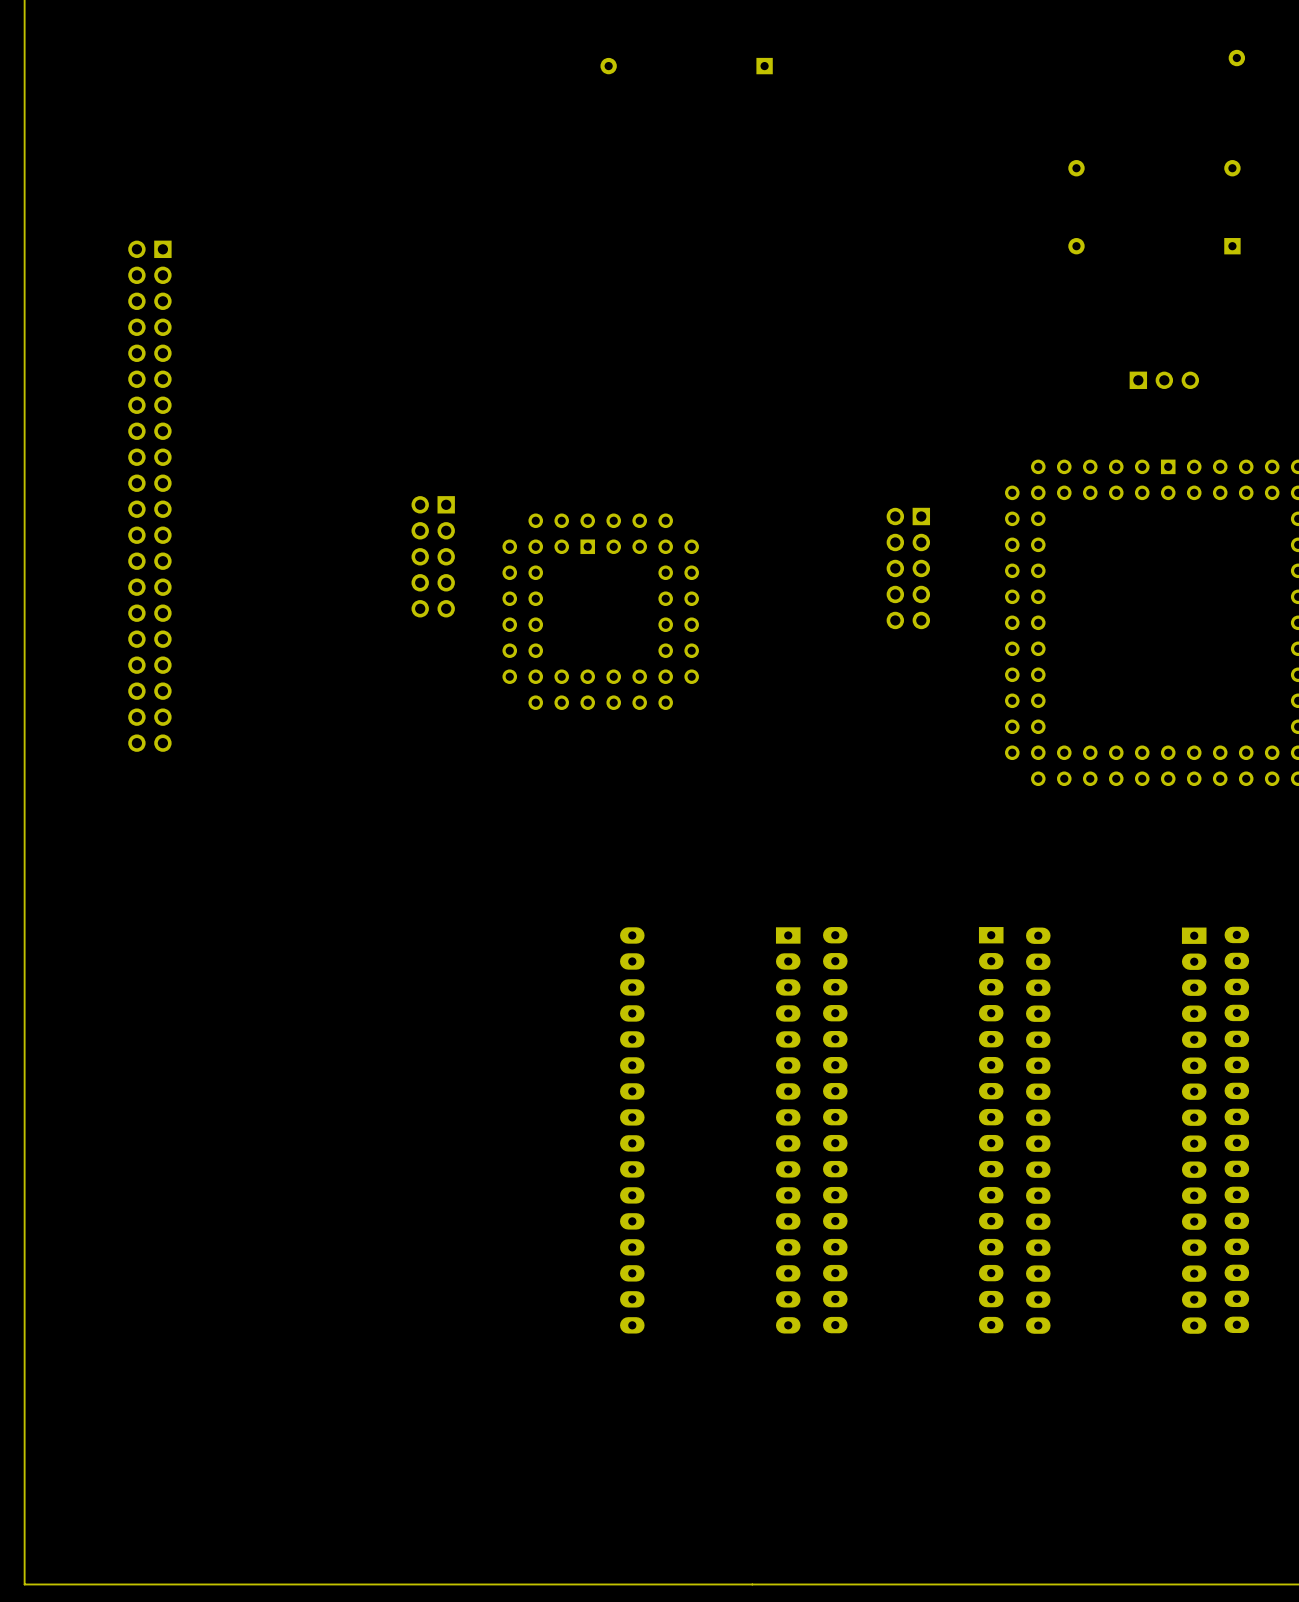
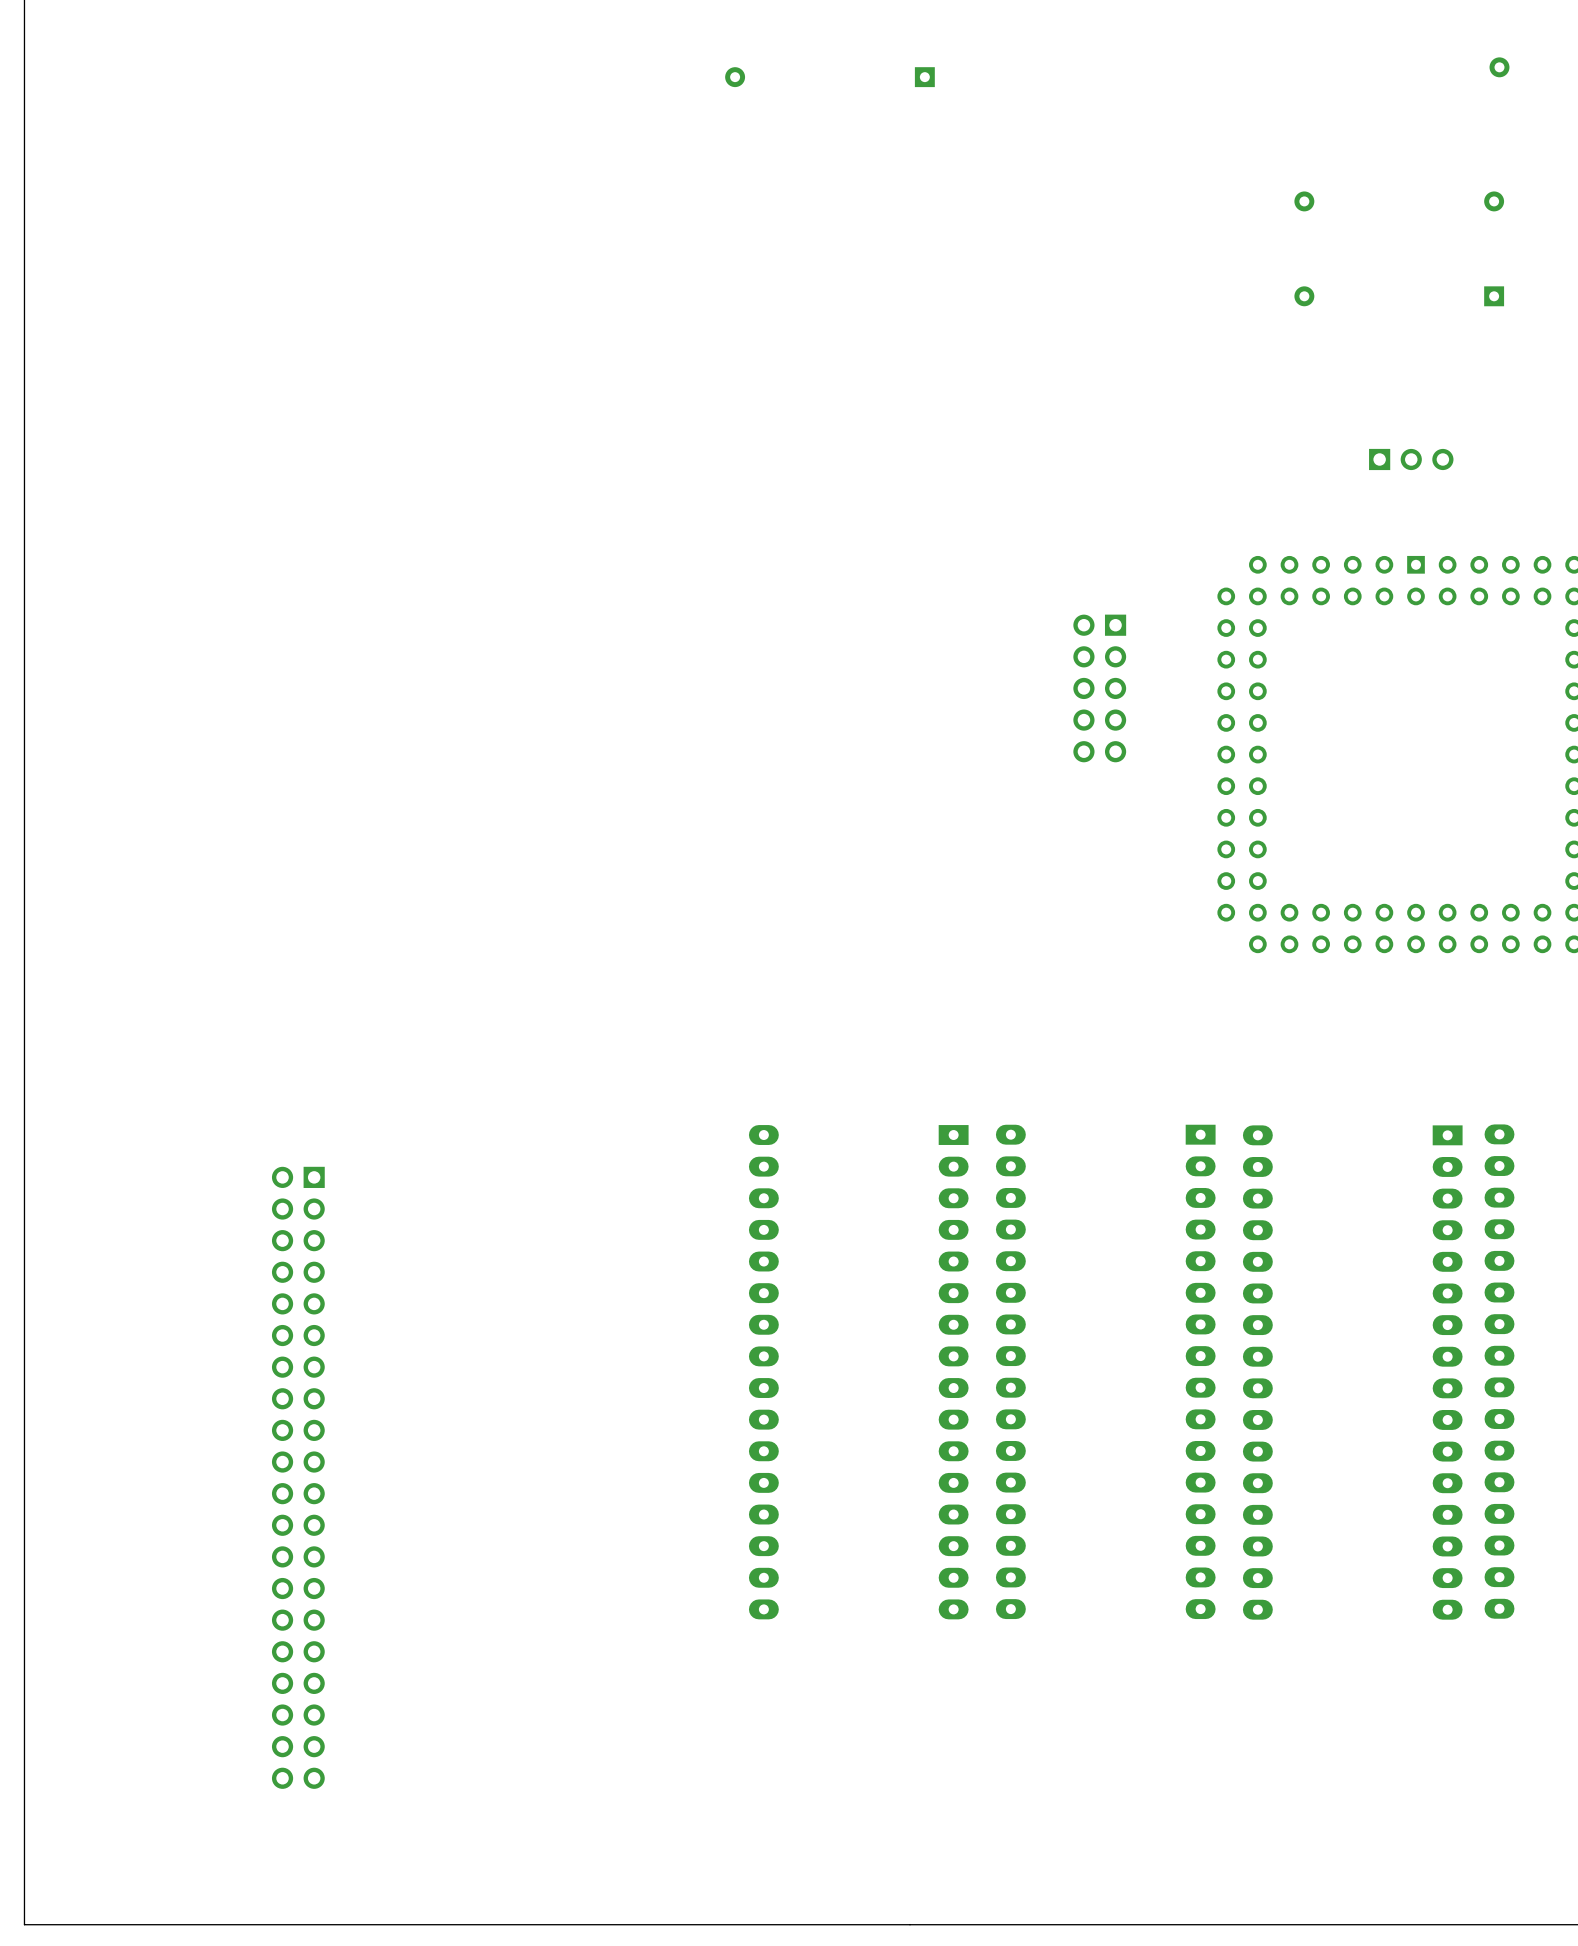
part: (149, 496) -> none
part: (433, 556) -> none
part: (600, 611) -> none
part: none -> (298, 1477)

